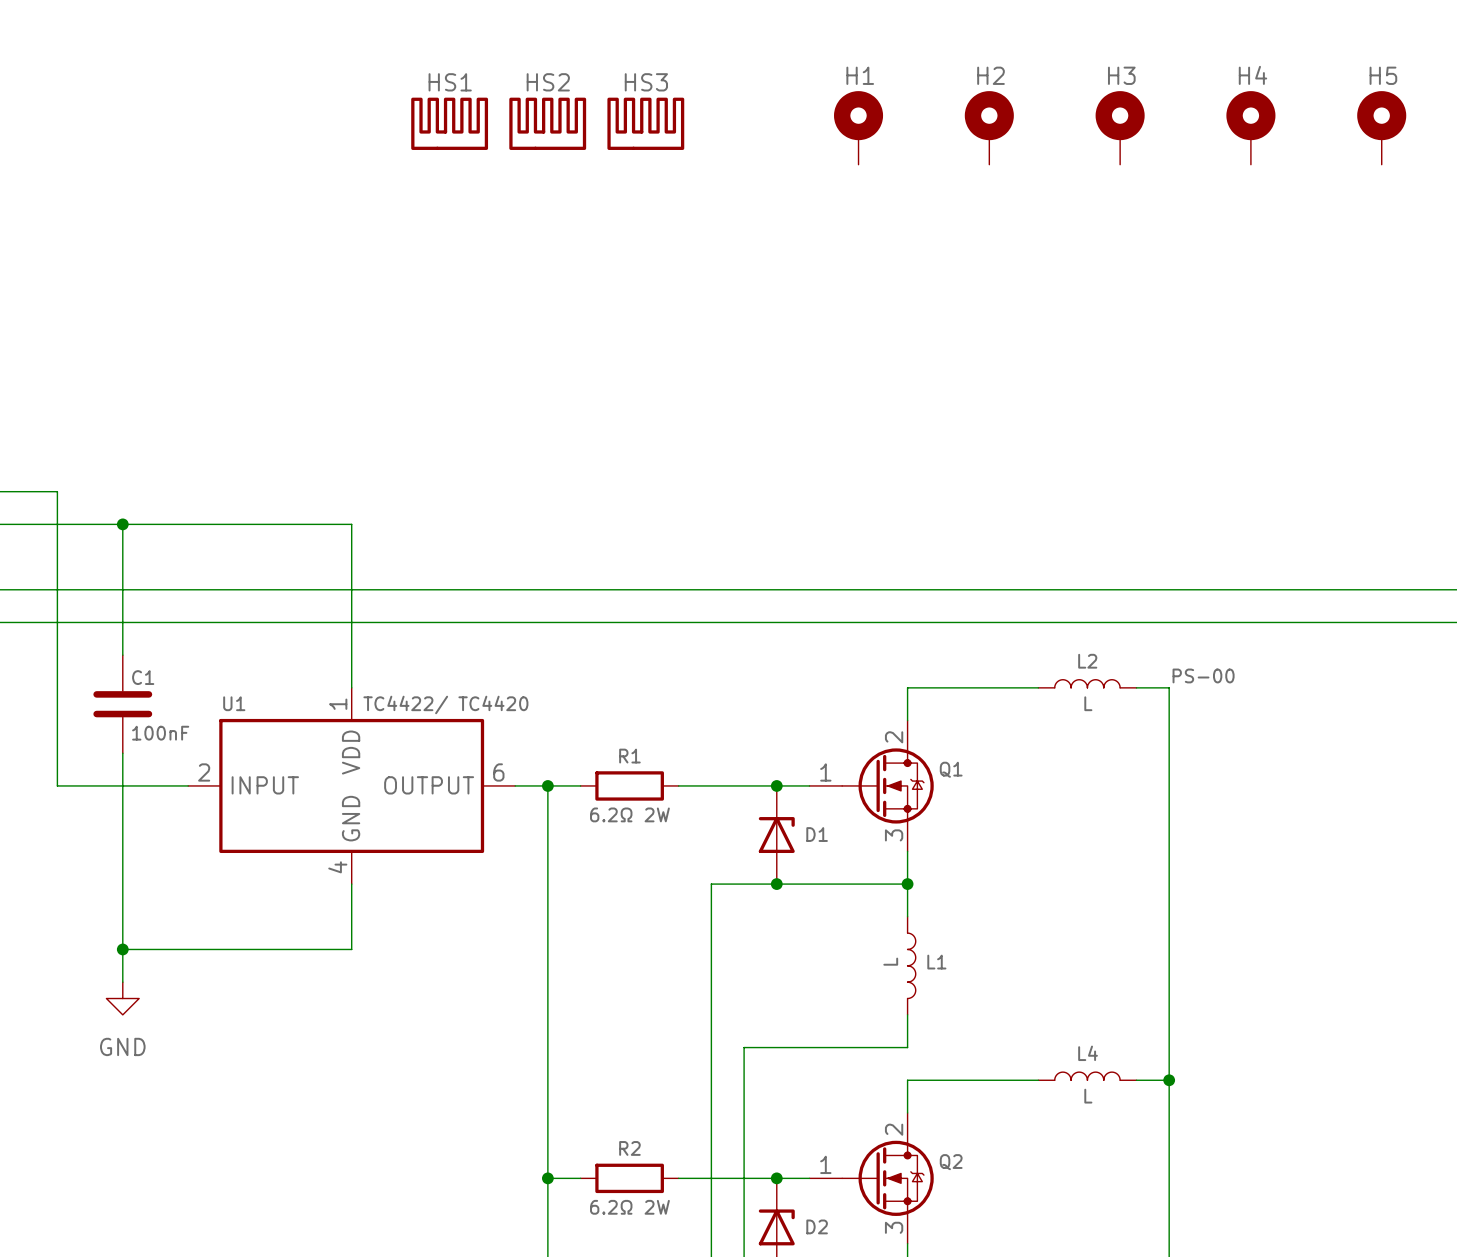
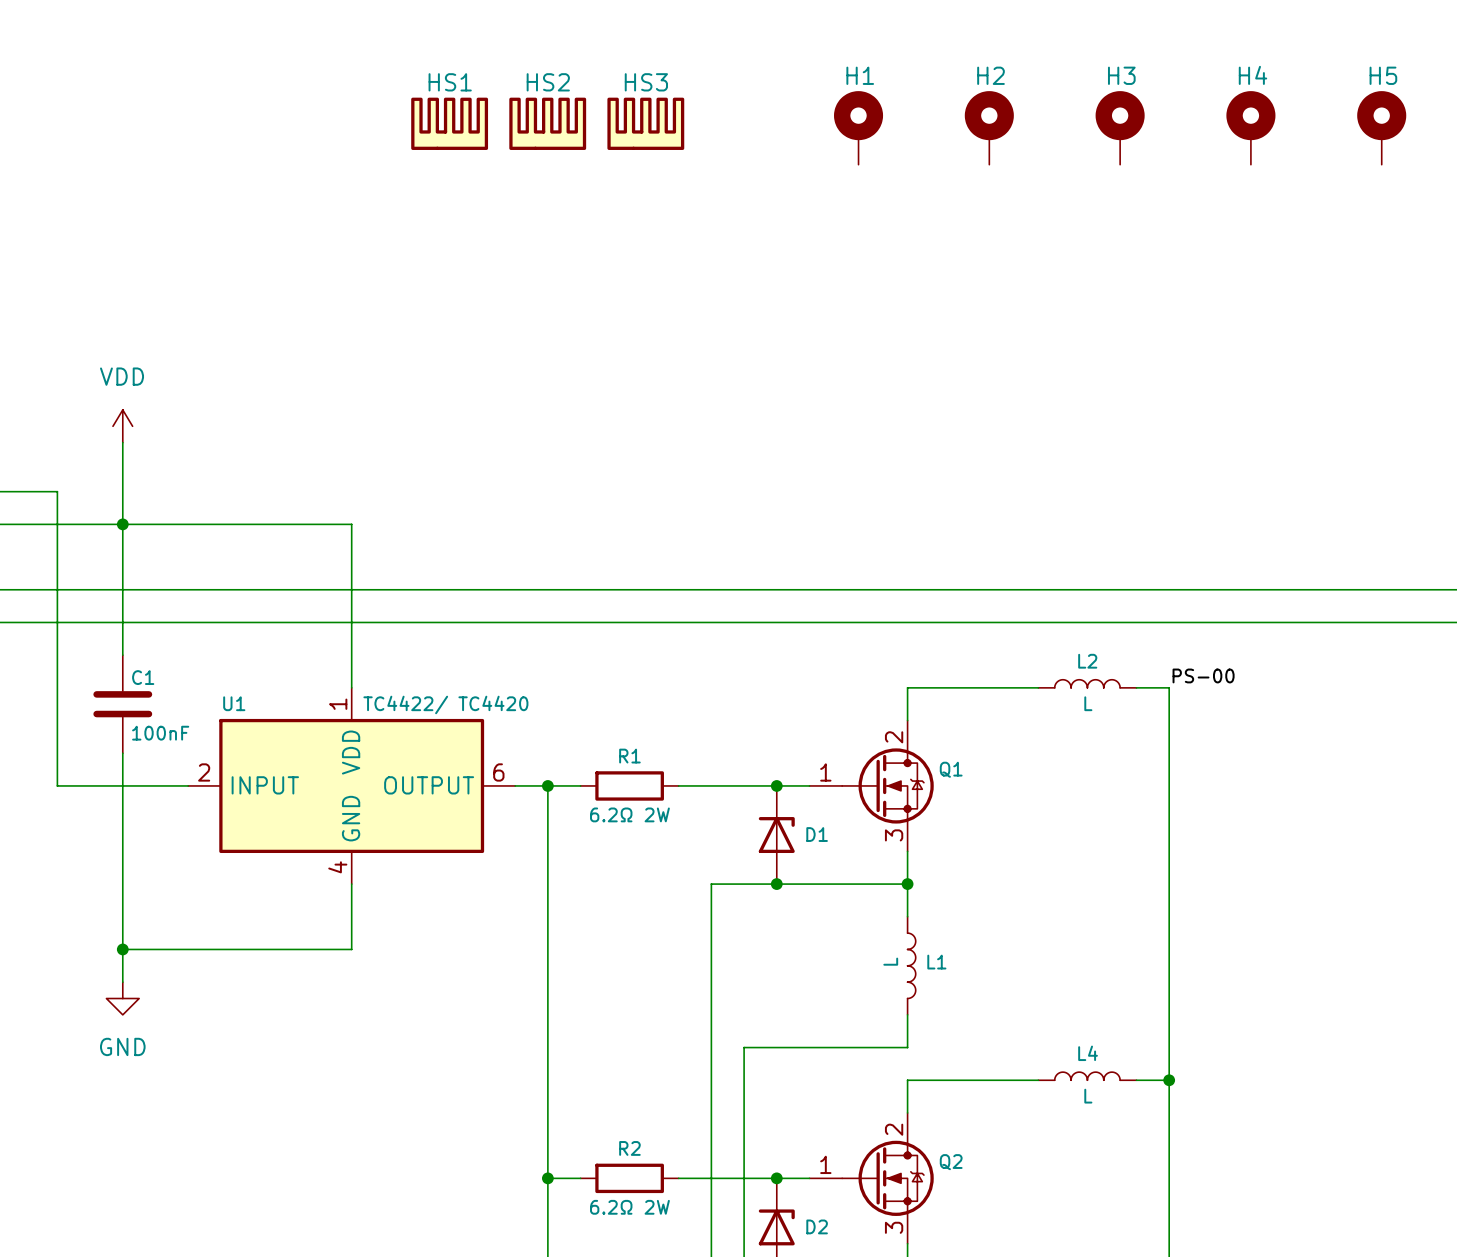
power symbol: none -> VDD (122, 426)
wire: none -> (122, 442) (122, 524)

